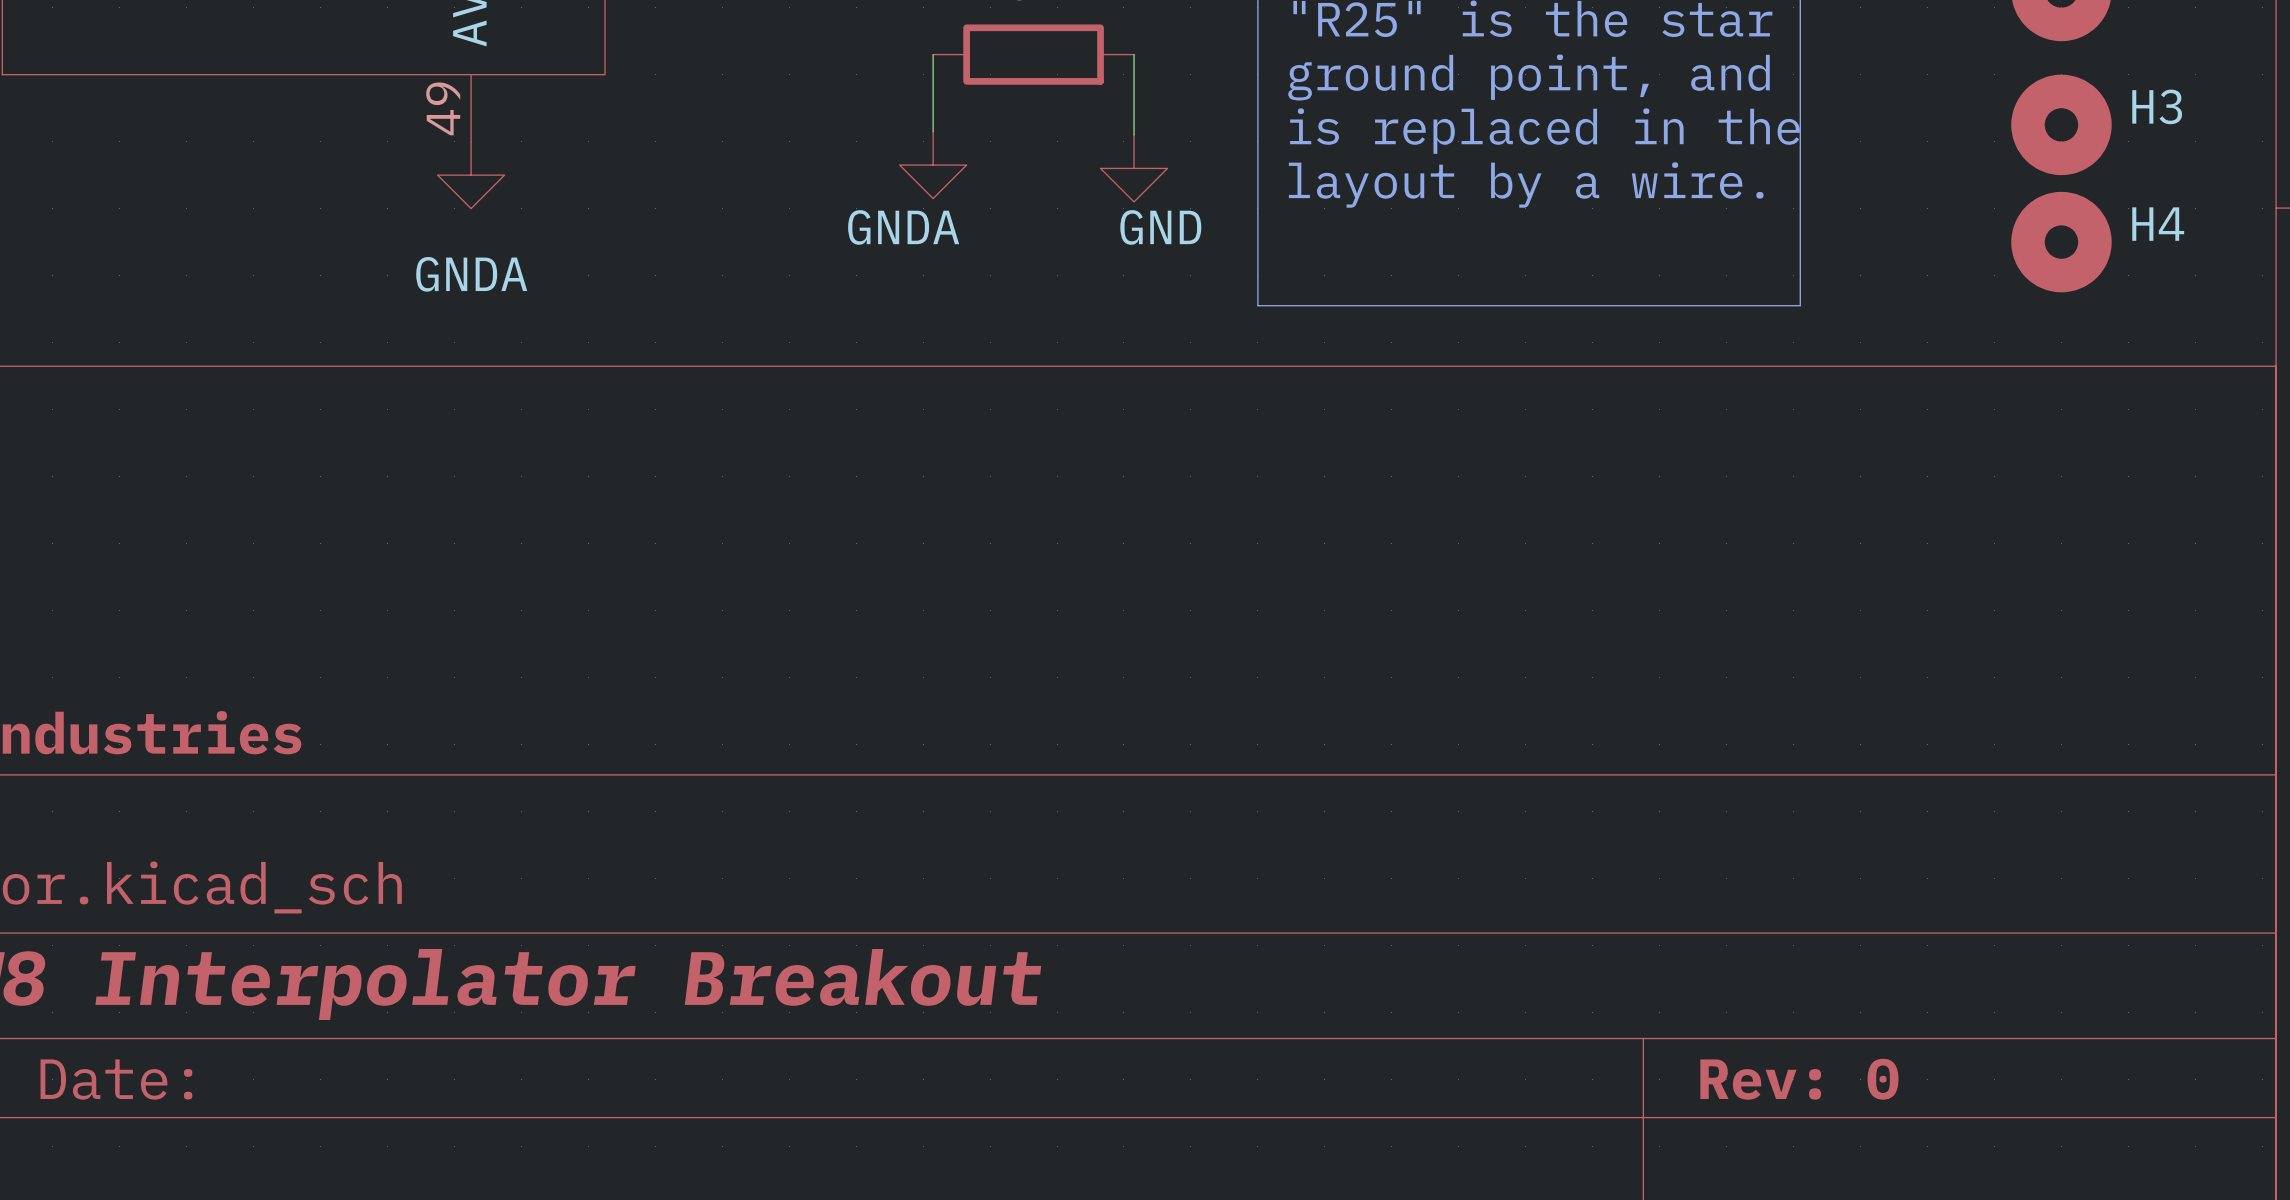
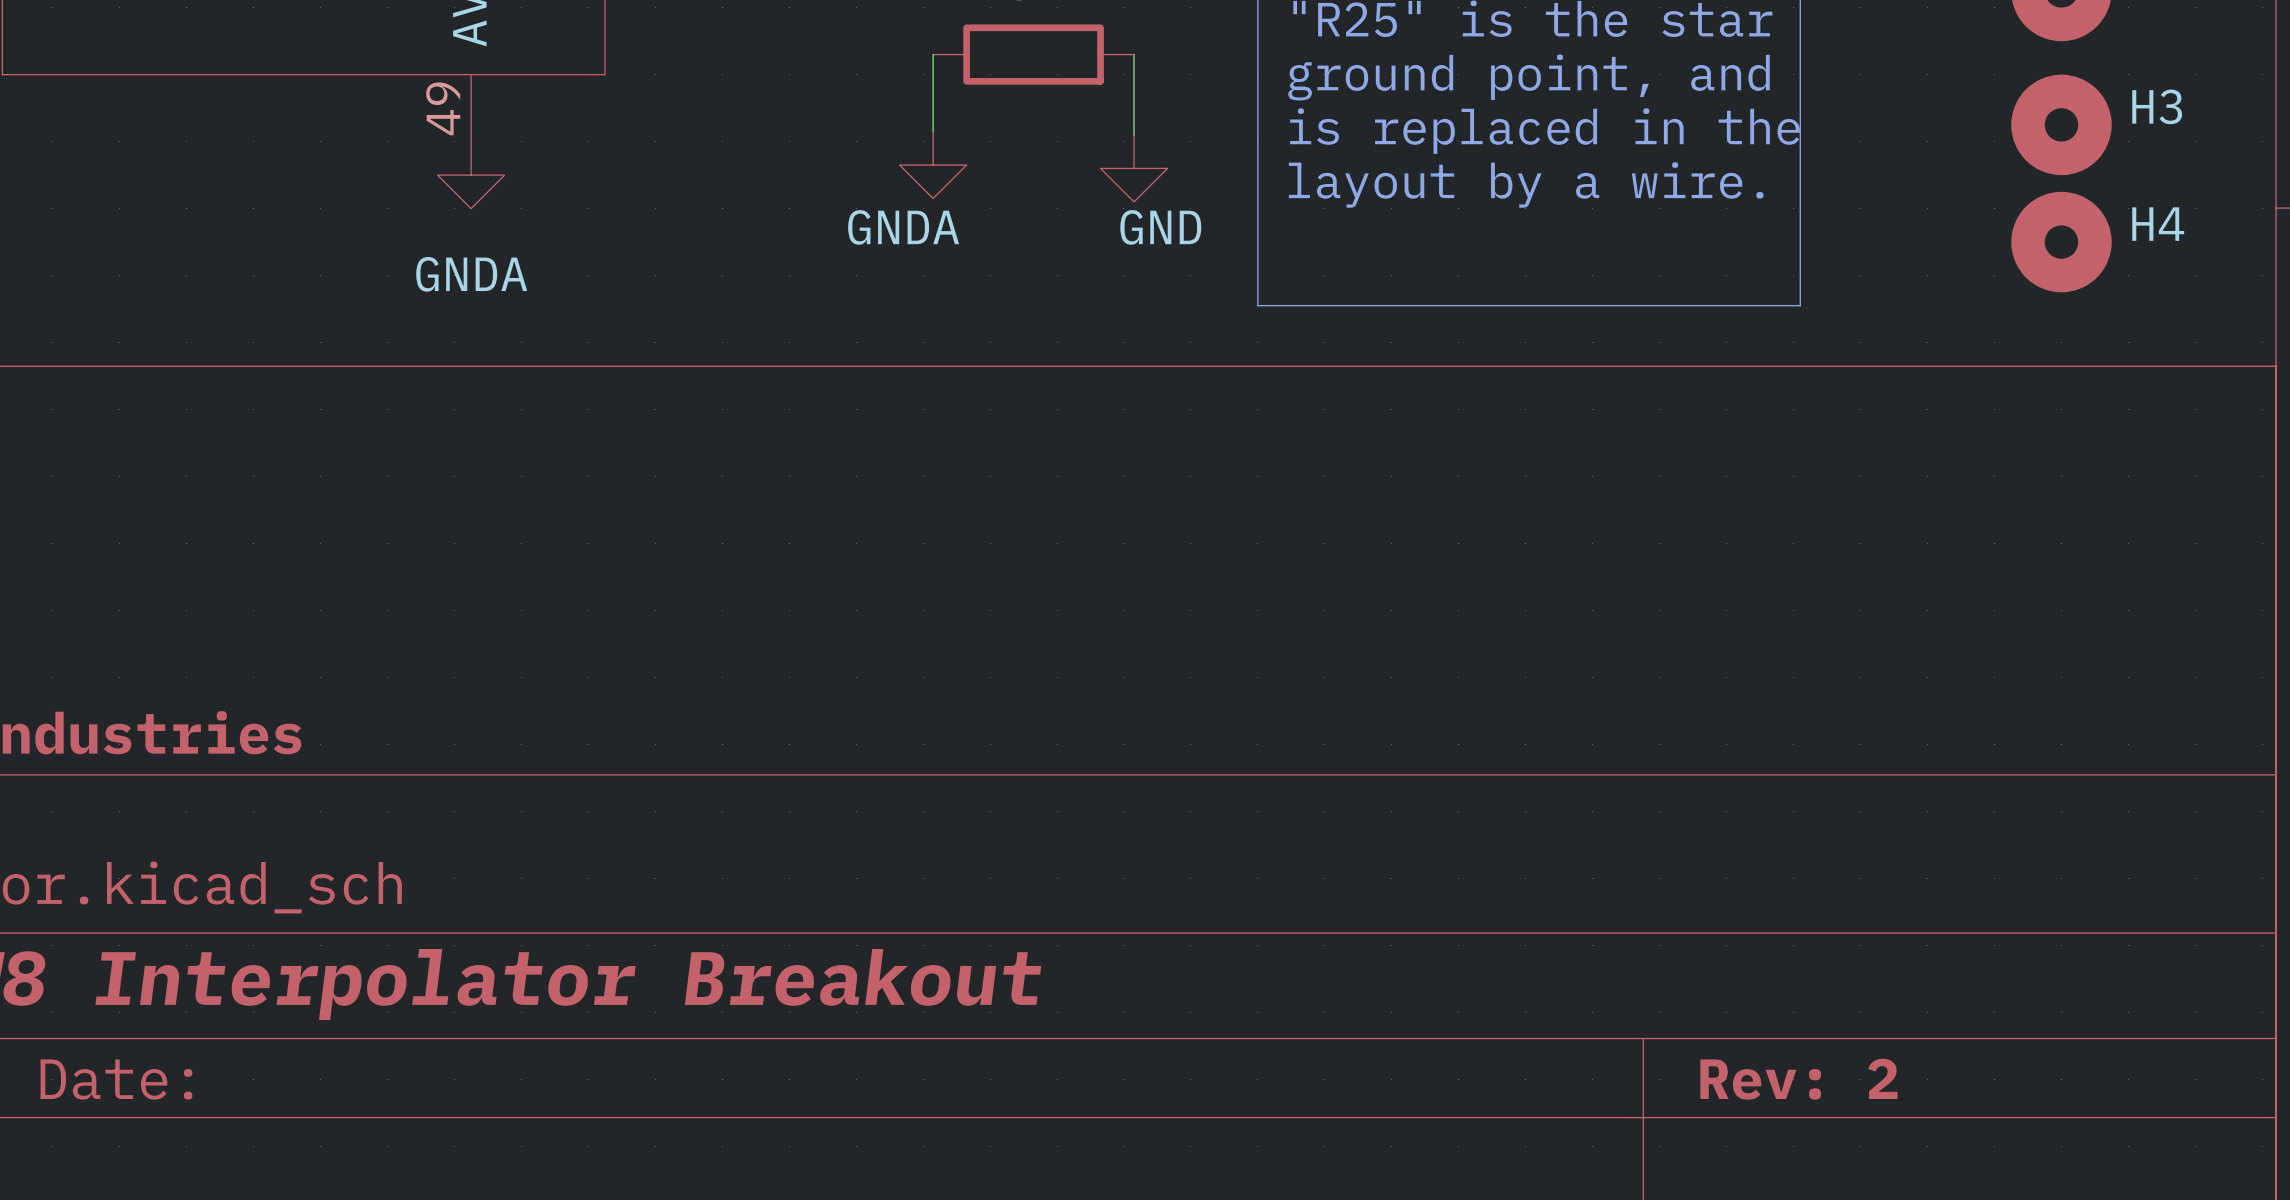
title block: Rev: 0 (1799, 1079) -> Rev: 2 (1798, 1079)

